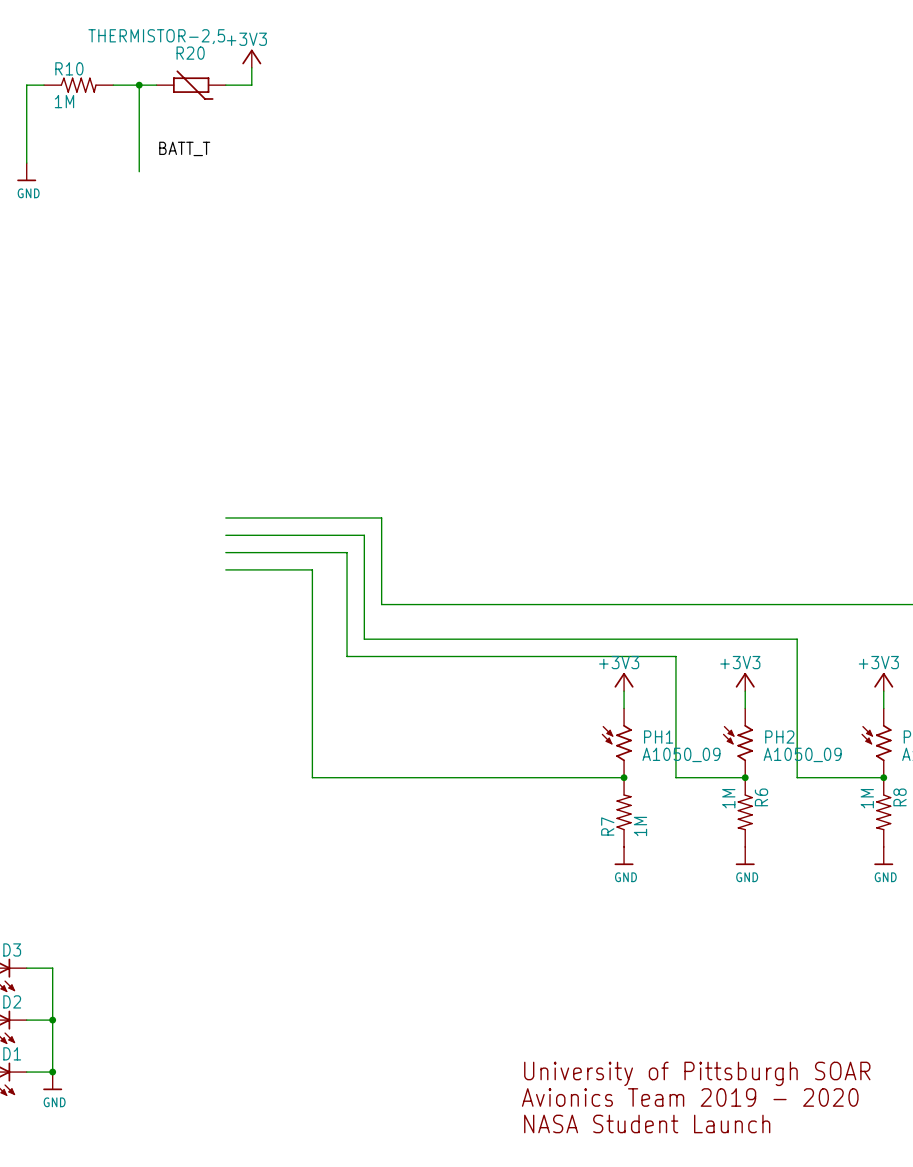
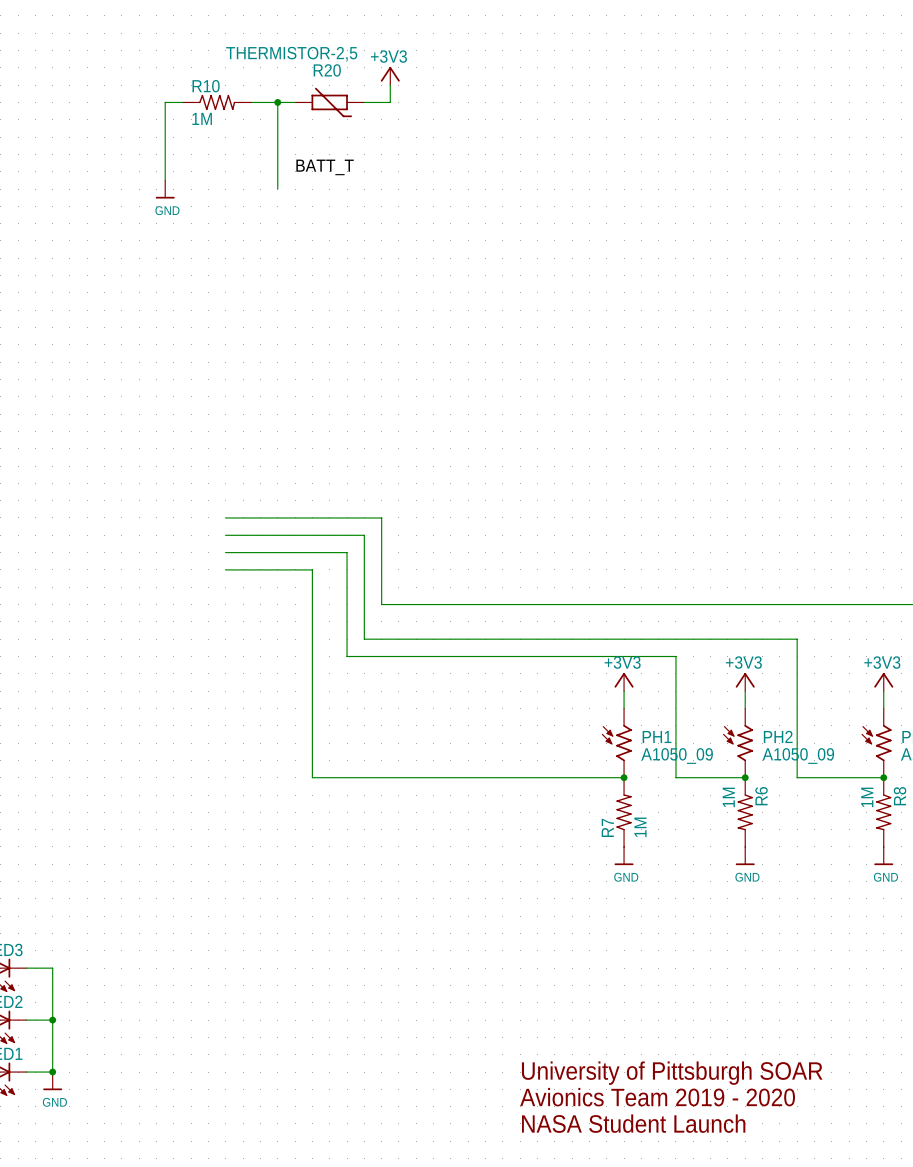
power symbol position: +3V3 (251, 58) -> +3V3 (390, 76)
wire: (251, 67) (251, 85) (225, 85) -> (390, 85) (390, 102) (364, 102)
wire: (44, 85) (26, 85) (26, 163) -> (182, 102) (165, 102) (165, 180)
R10 position: (78, 85) -> (217, 102)
wire: (113, 85) (156, 85) -> (251, 102) (295, 102)
wire: (139, 85) (139, 171) -> (277, 102) (277, 189)
junction: (139, 85) -> none
R20 position: (191, 85) -> (329, 102)
junction: none -> (277, 102)
label position: BATT_T (184, 148) -> BATT_T (325, 167)
power symbol position: GND (26, 172) -> GND (165, 189)

